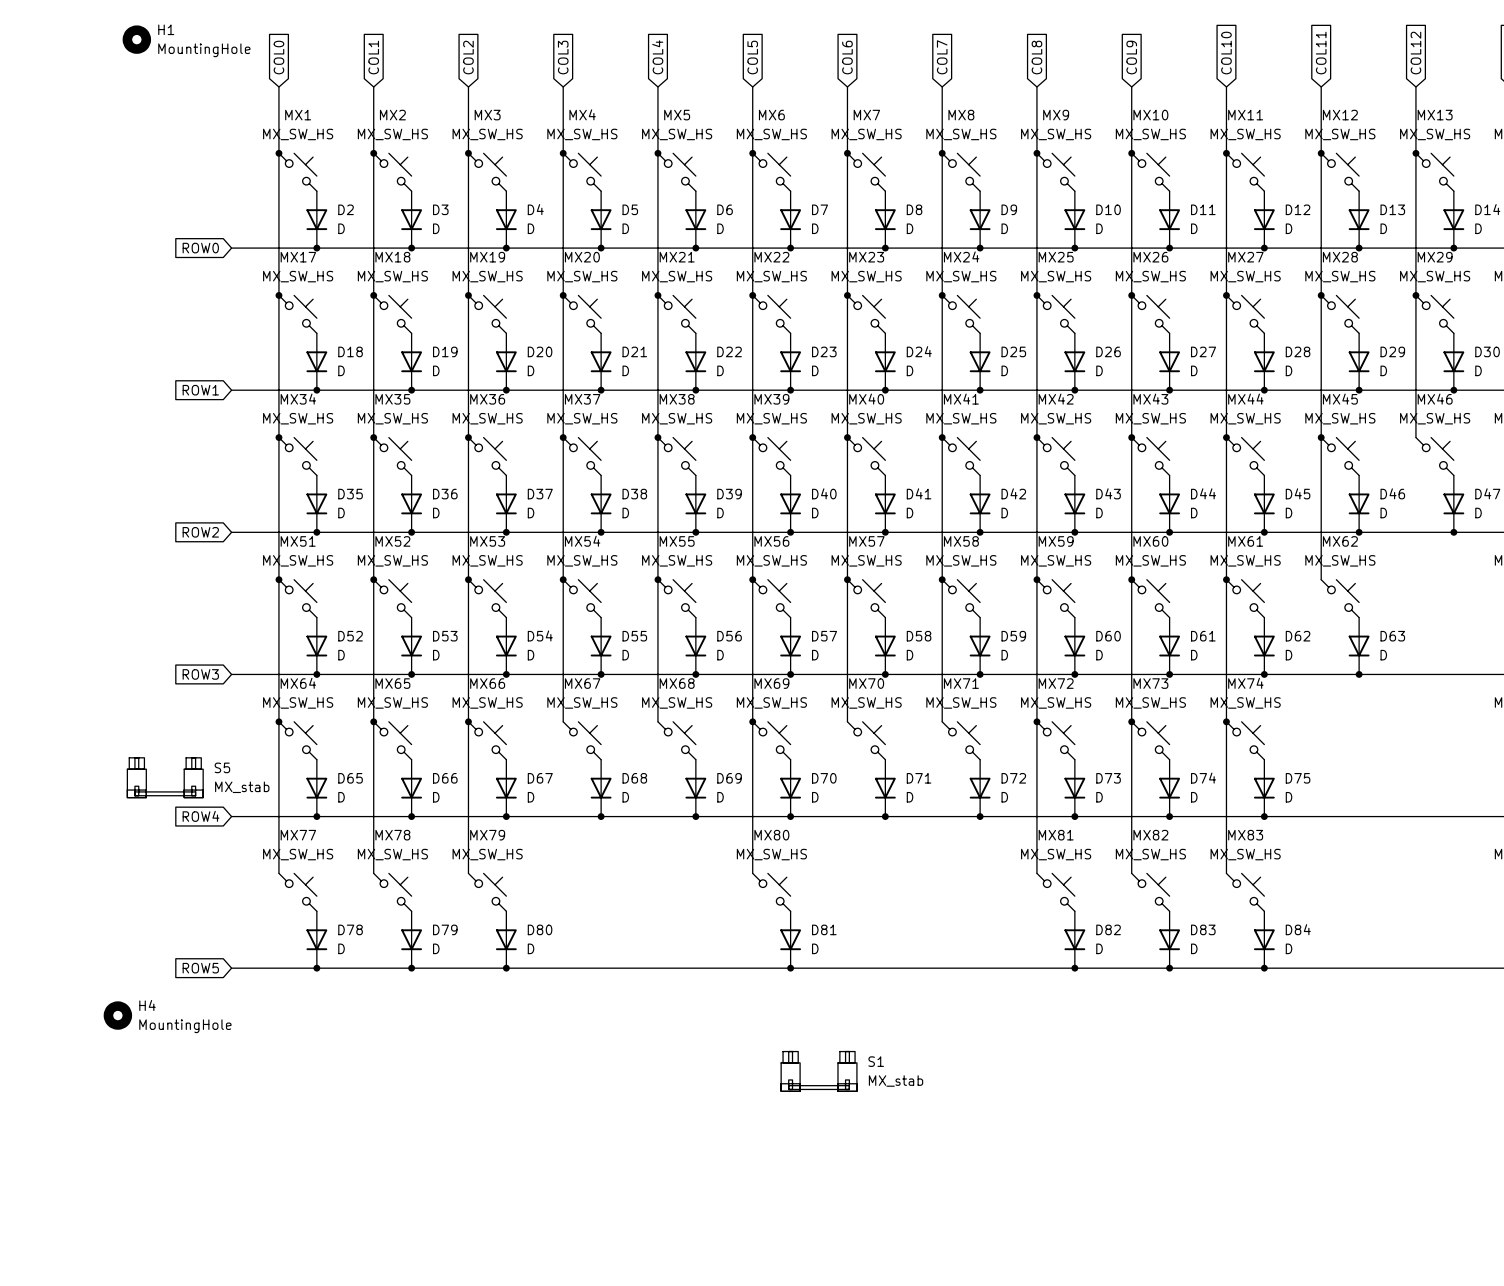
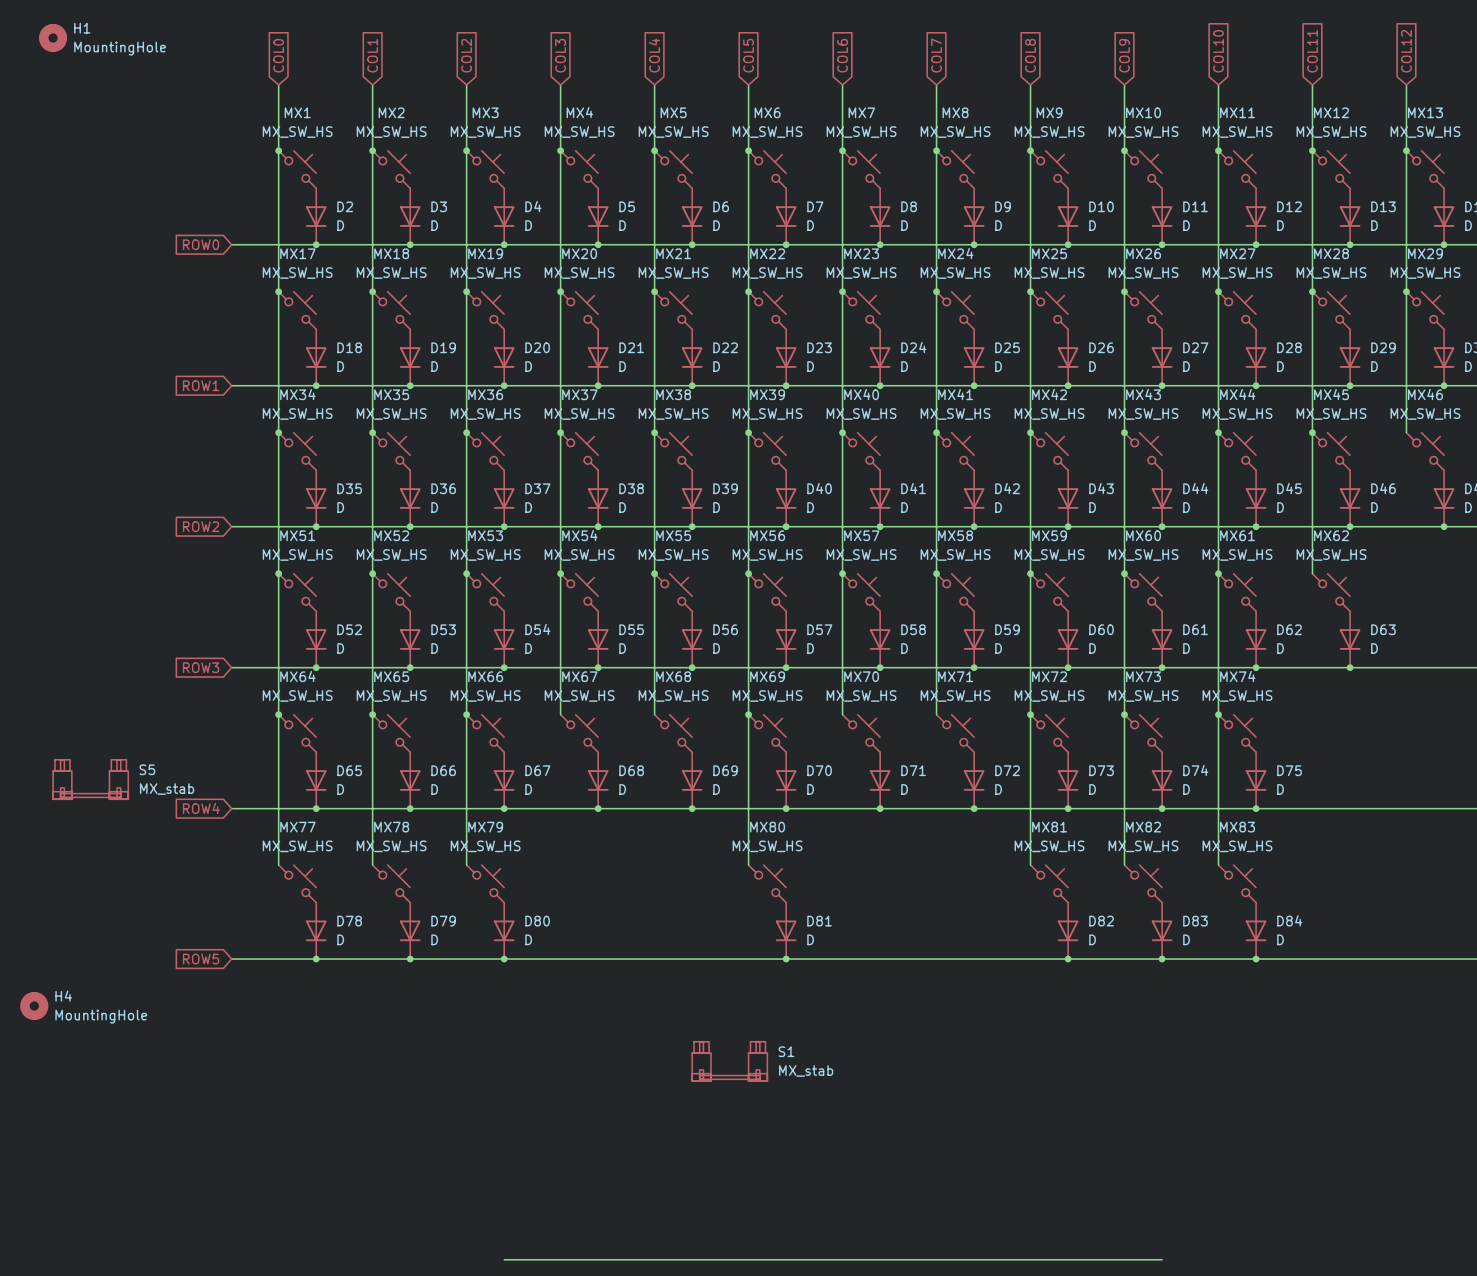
H1 position: (136, 39) -> (53, 37)
S5 position: (165, 777) -> (90, 779)
H4 position: (117, 1015) -> (34, 1006)
S1 position: (819, 1071) -> (729, 1061)
wire: none -> (504, 1259) (1162, 1259)

